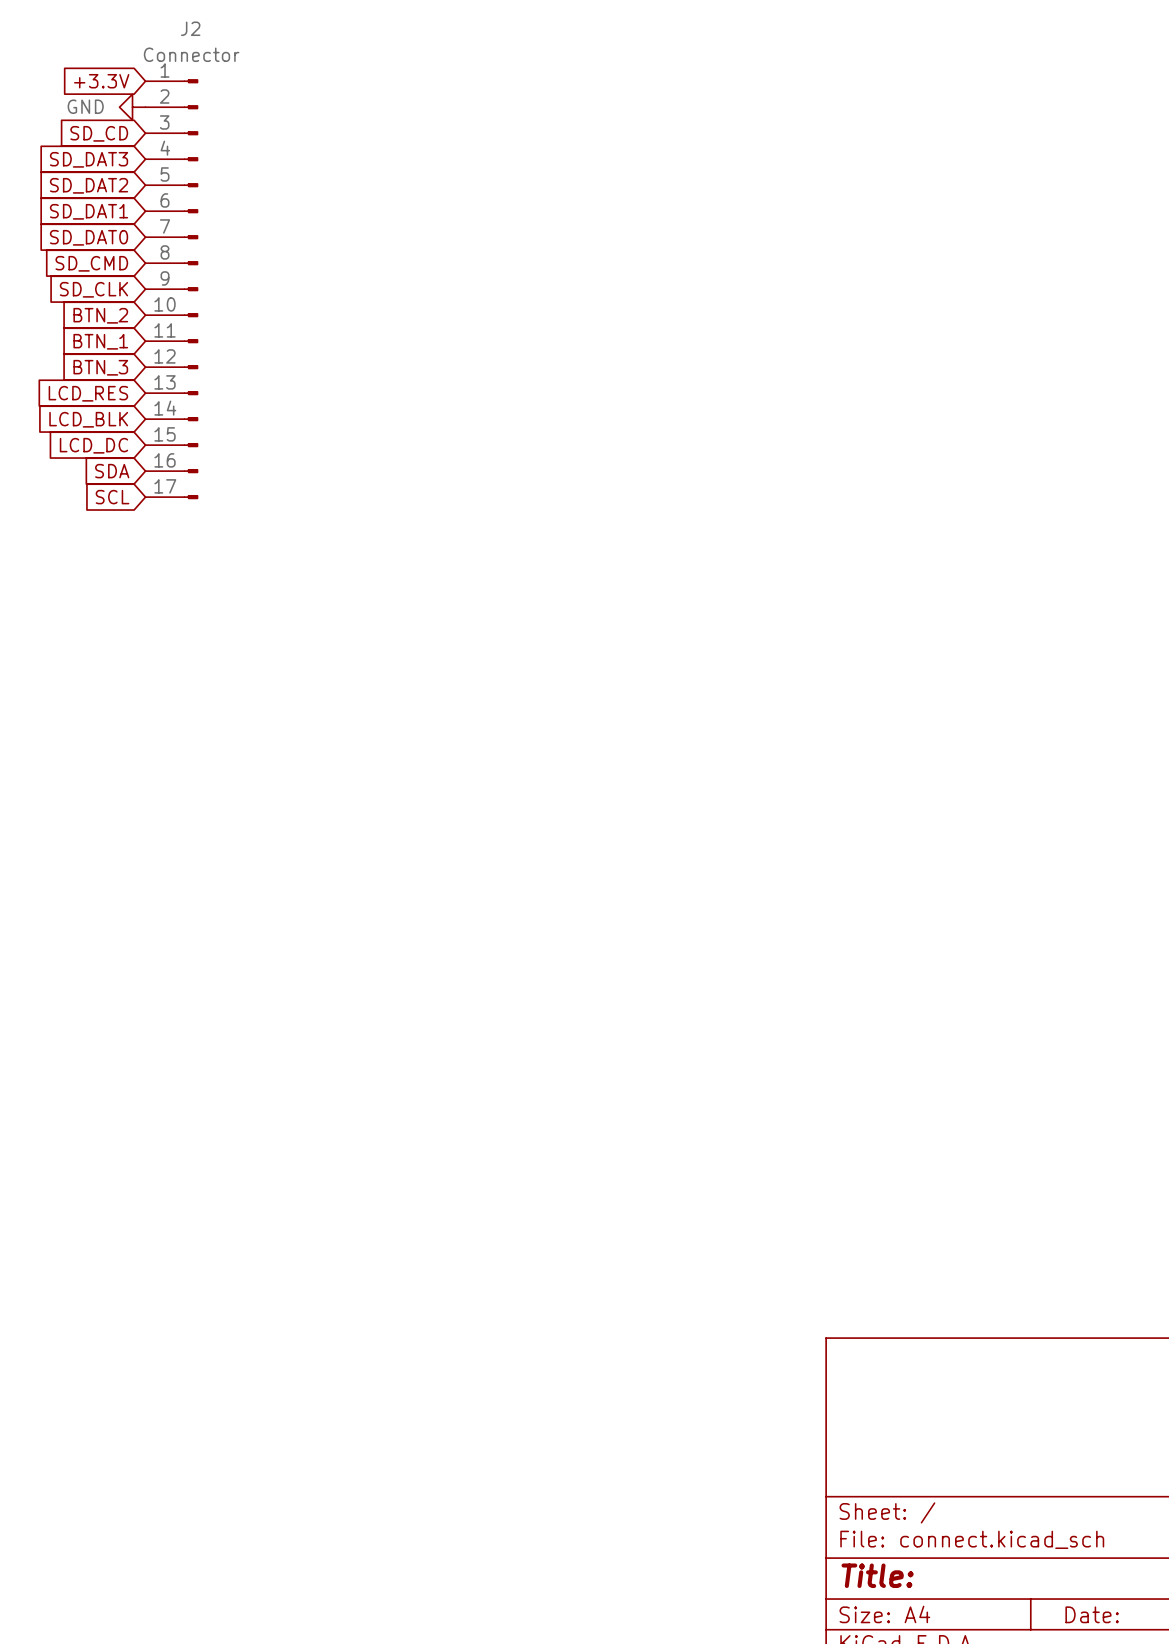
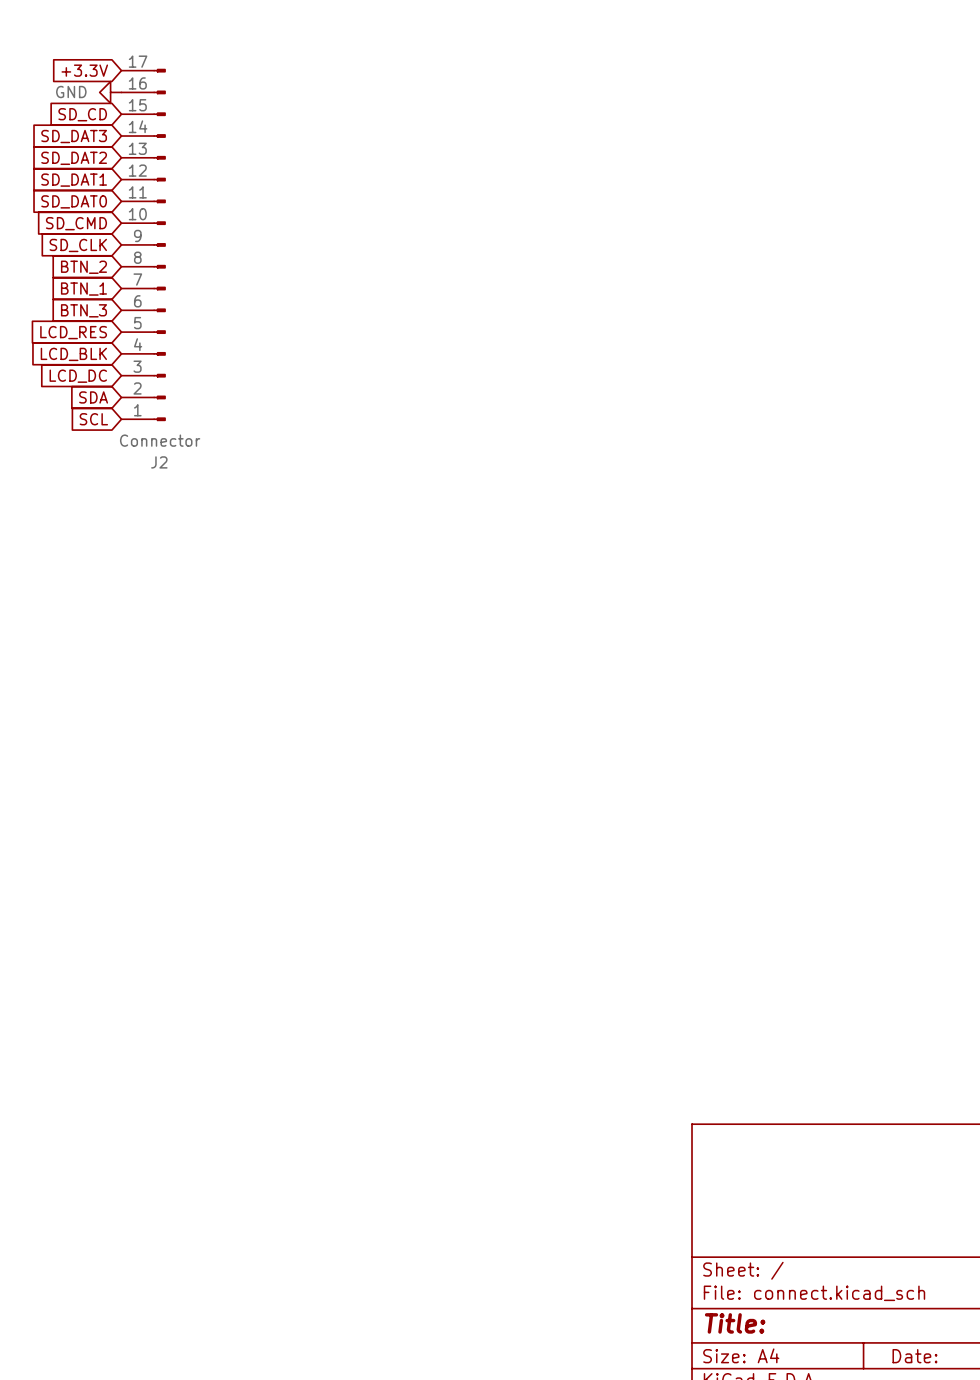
J2 flip: as is (191, 289) -> up-down (159, 244)

